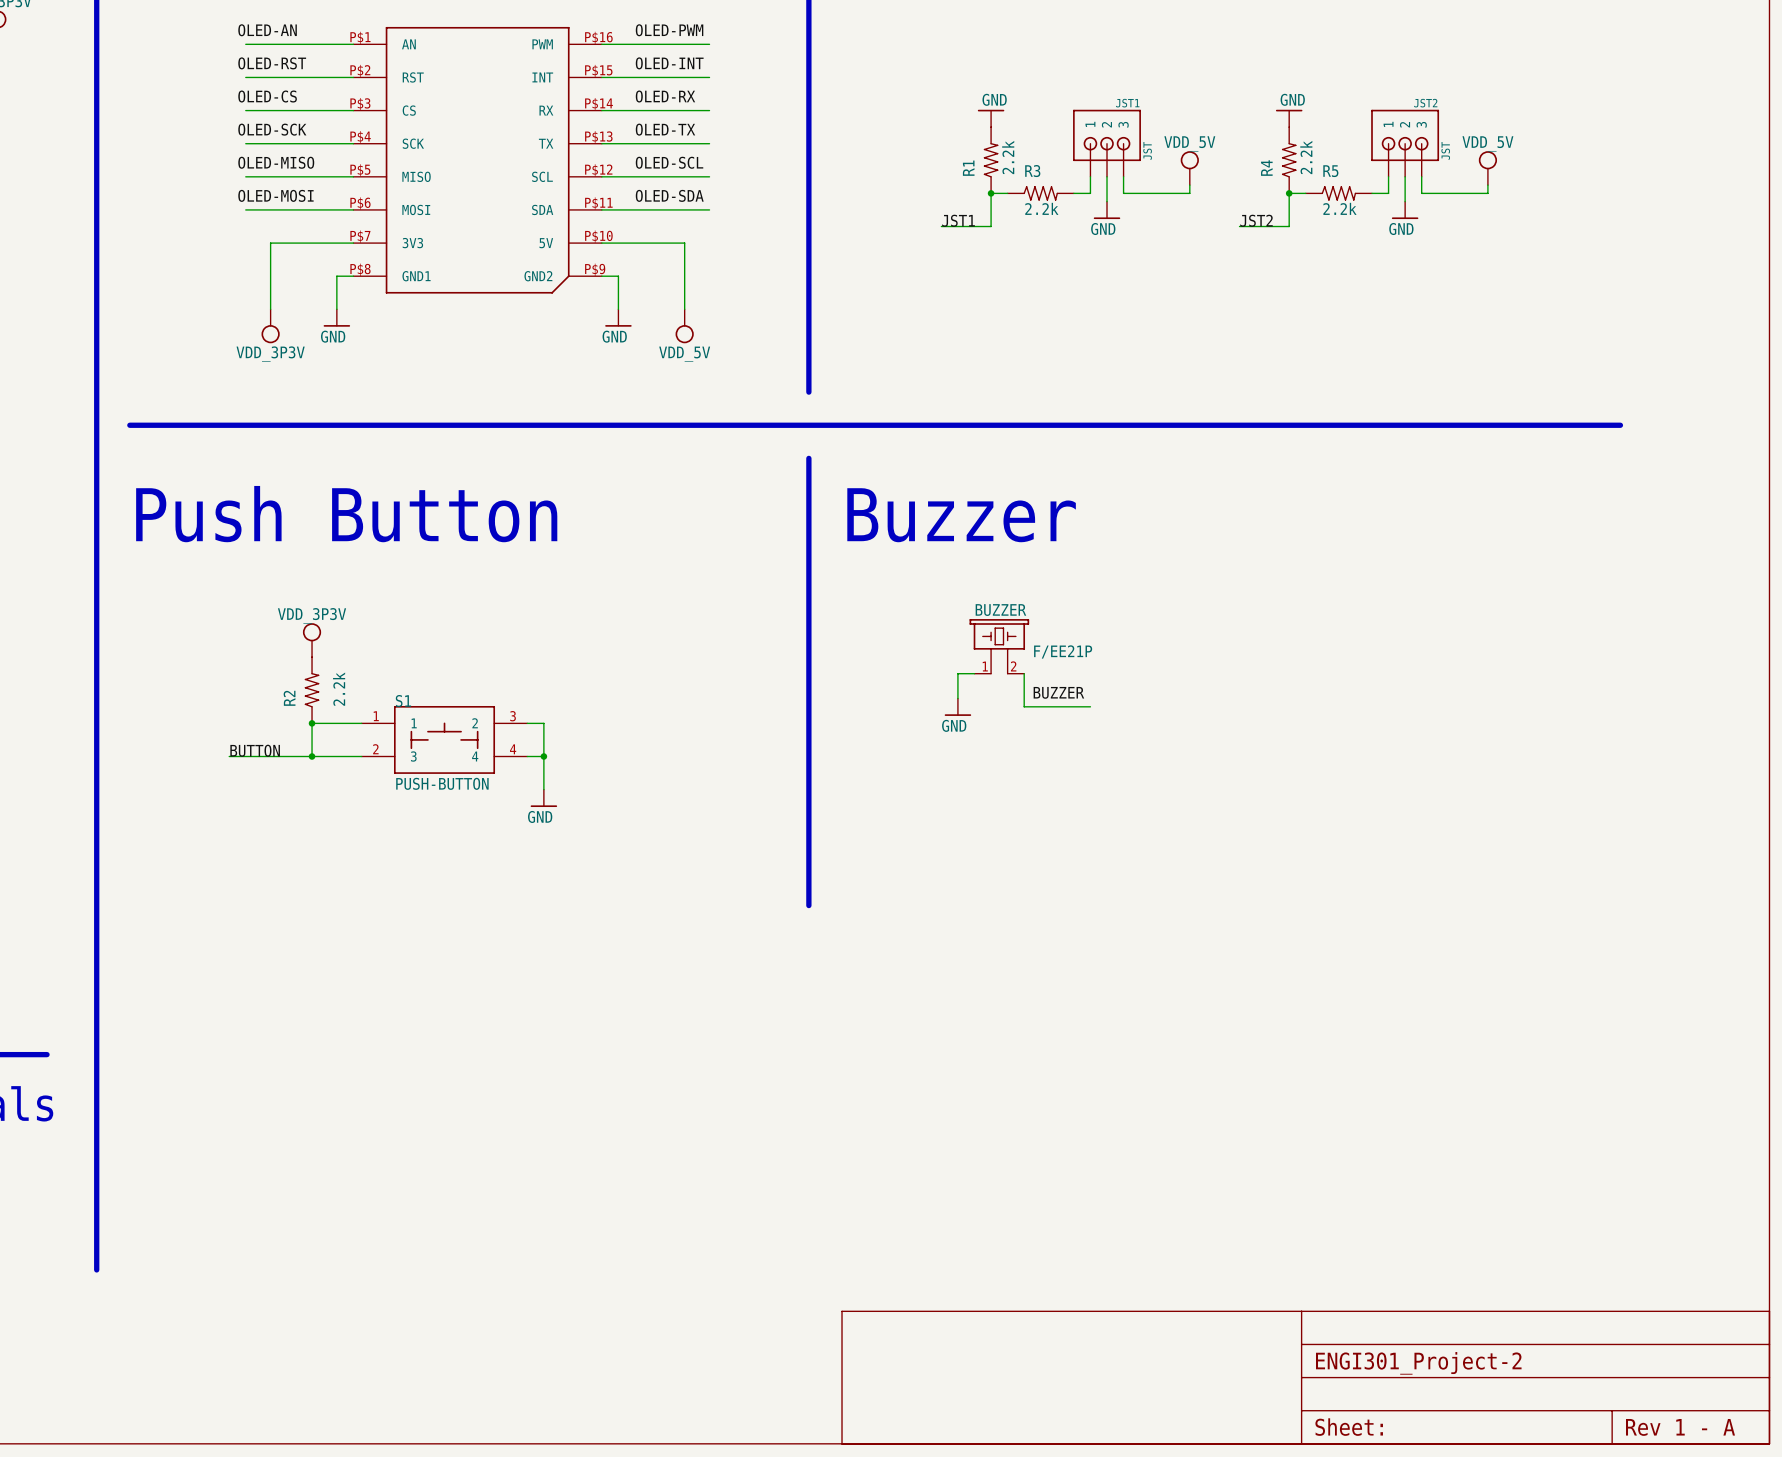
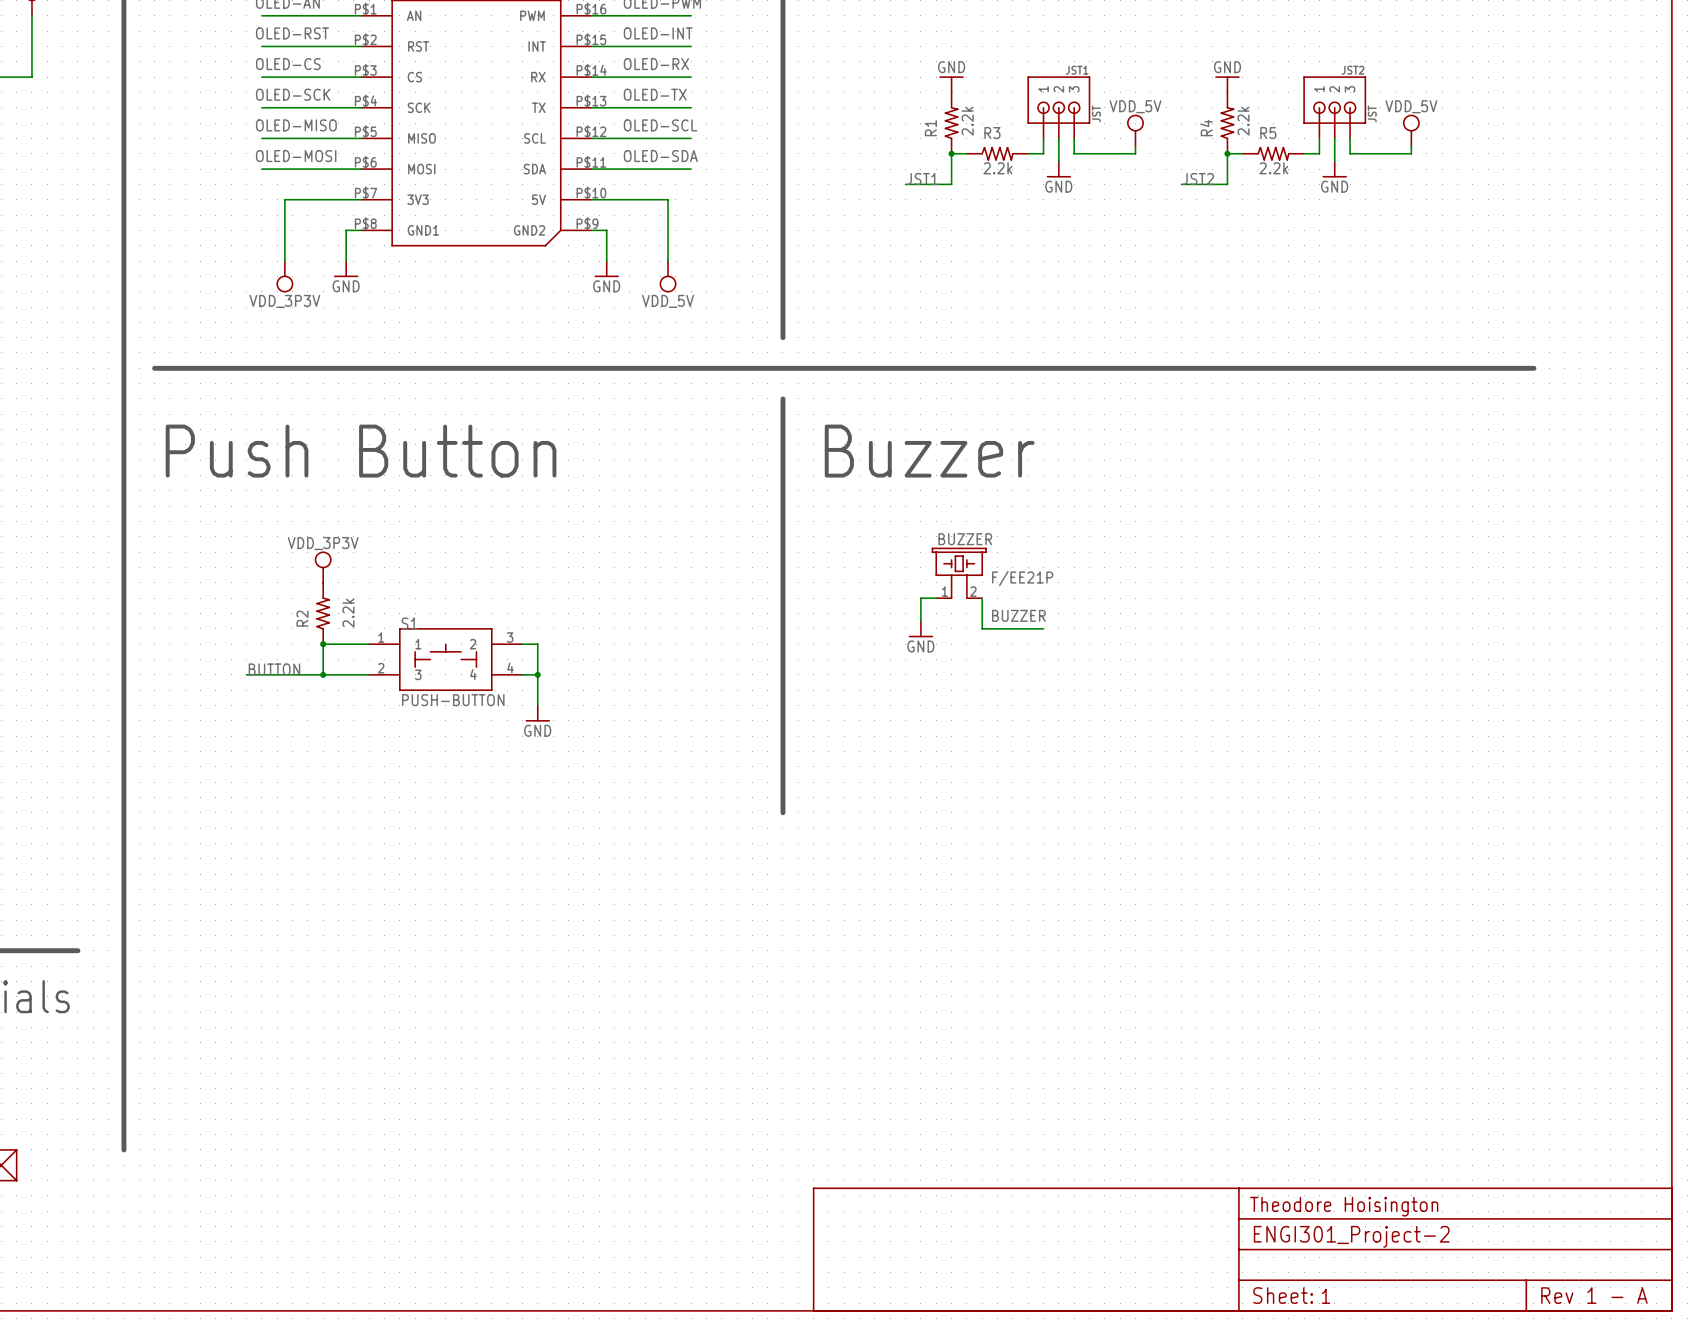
text: none -> Theodore Hoisington (1344, 1206)
text: none -> 1 (1326, 1296)

